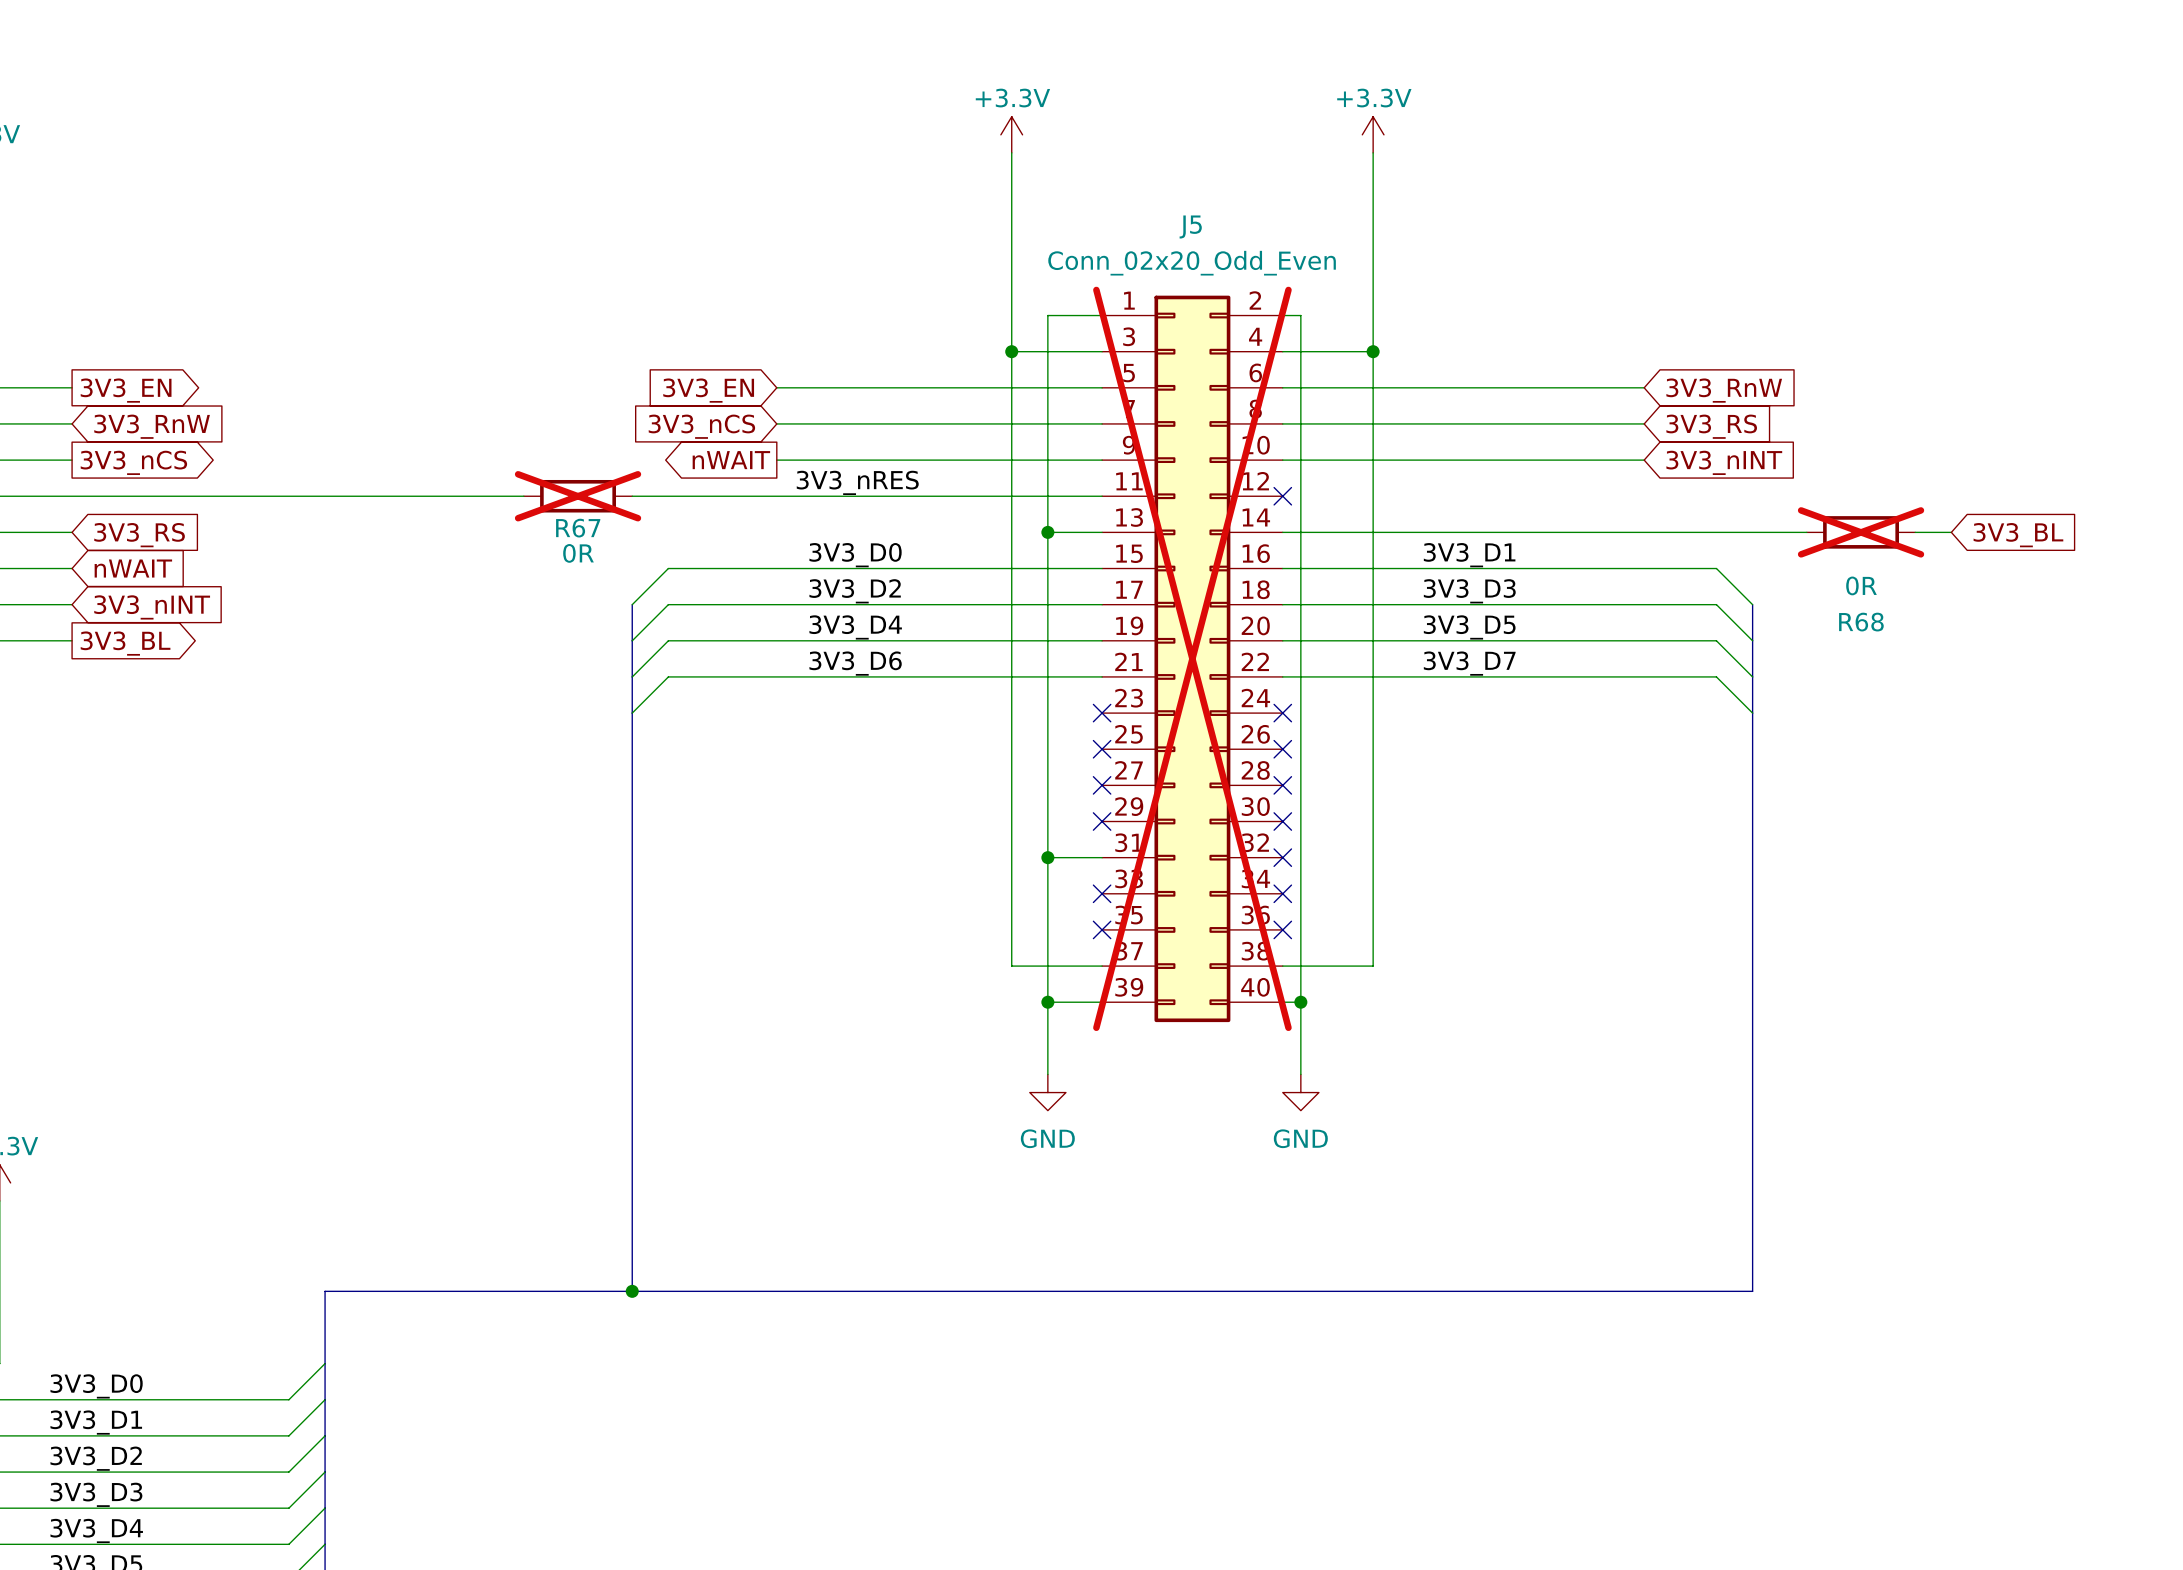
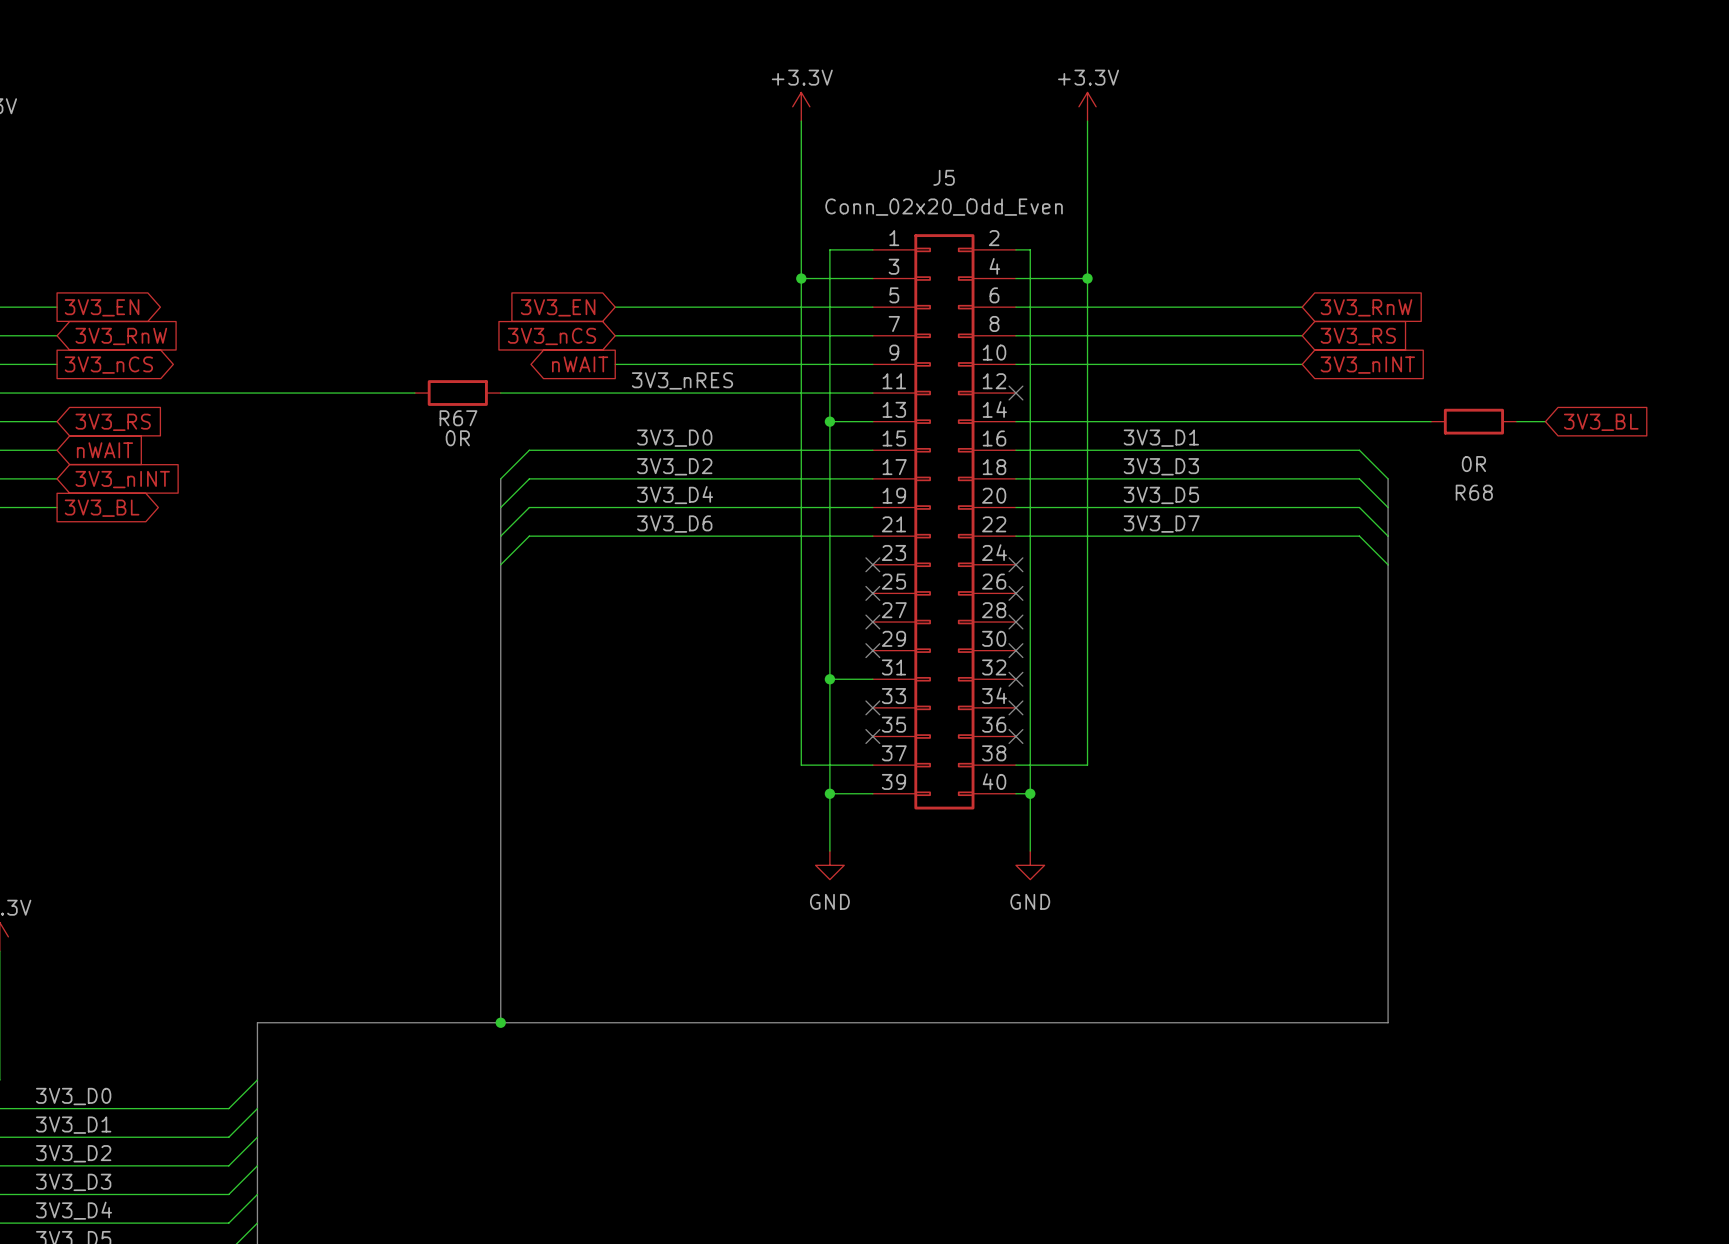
R67 do-not-place cross: (578, 496) -> none
R68 do-not-place cross: (1861, 532) -> none
J5 do-not-place cross: (1192, 658) -> none

